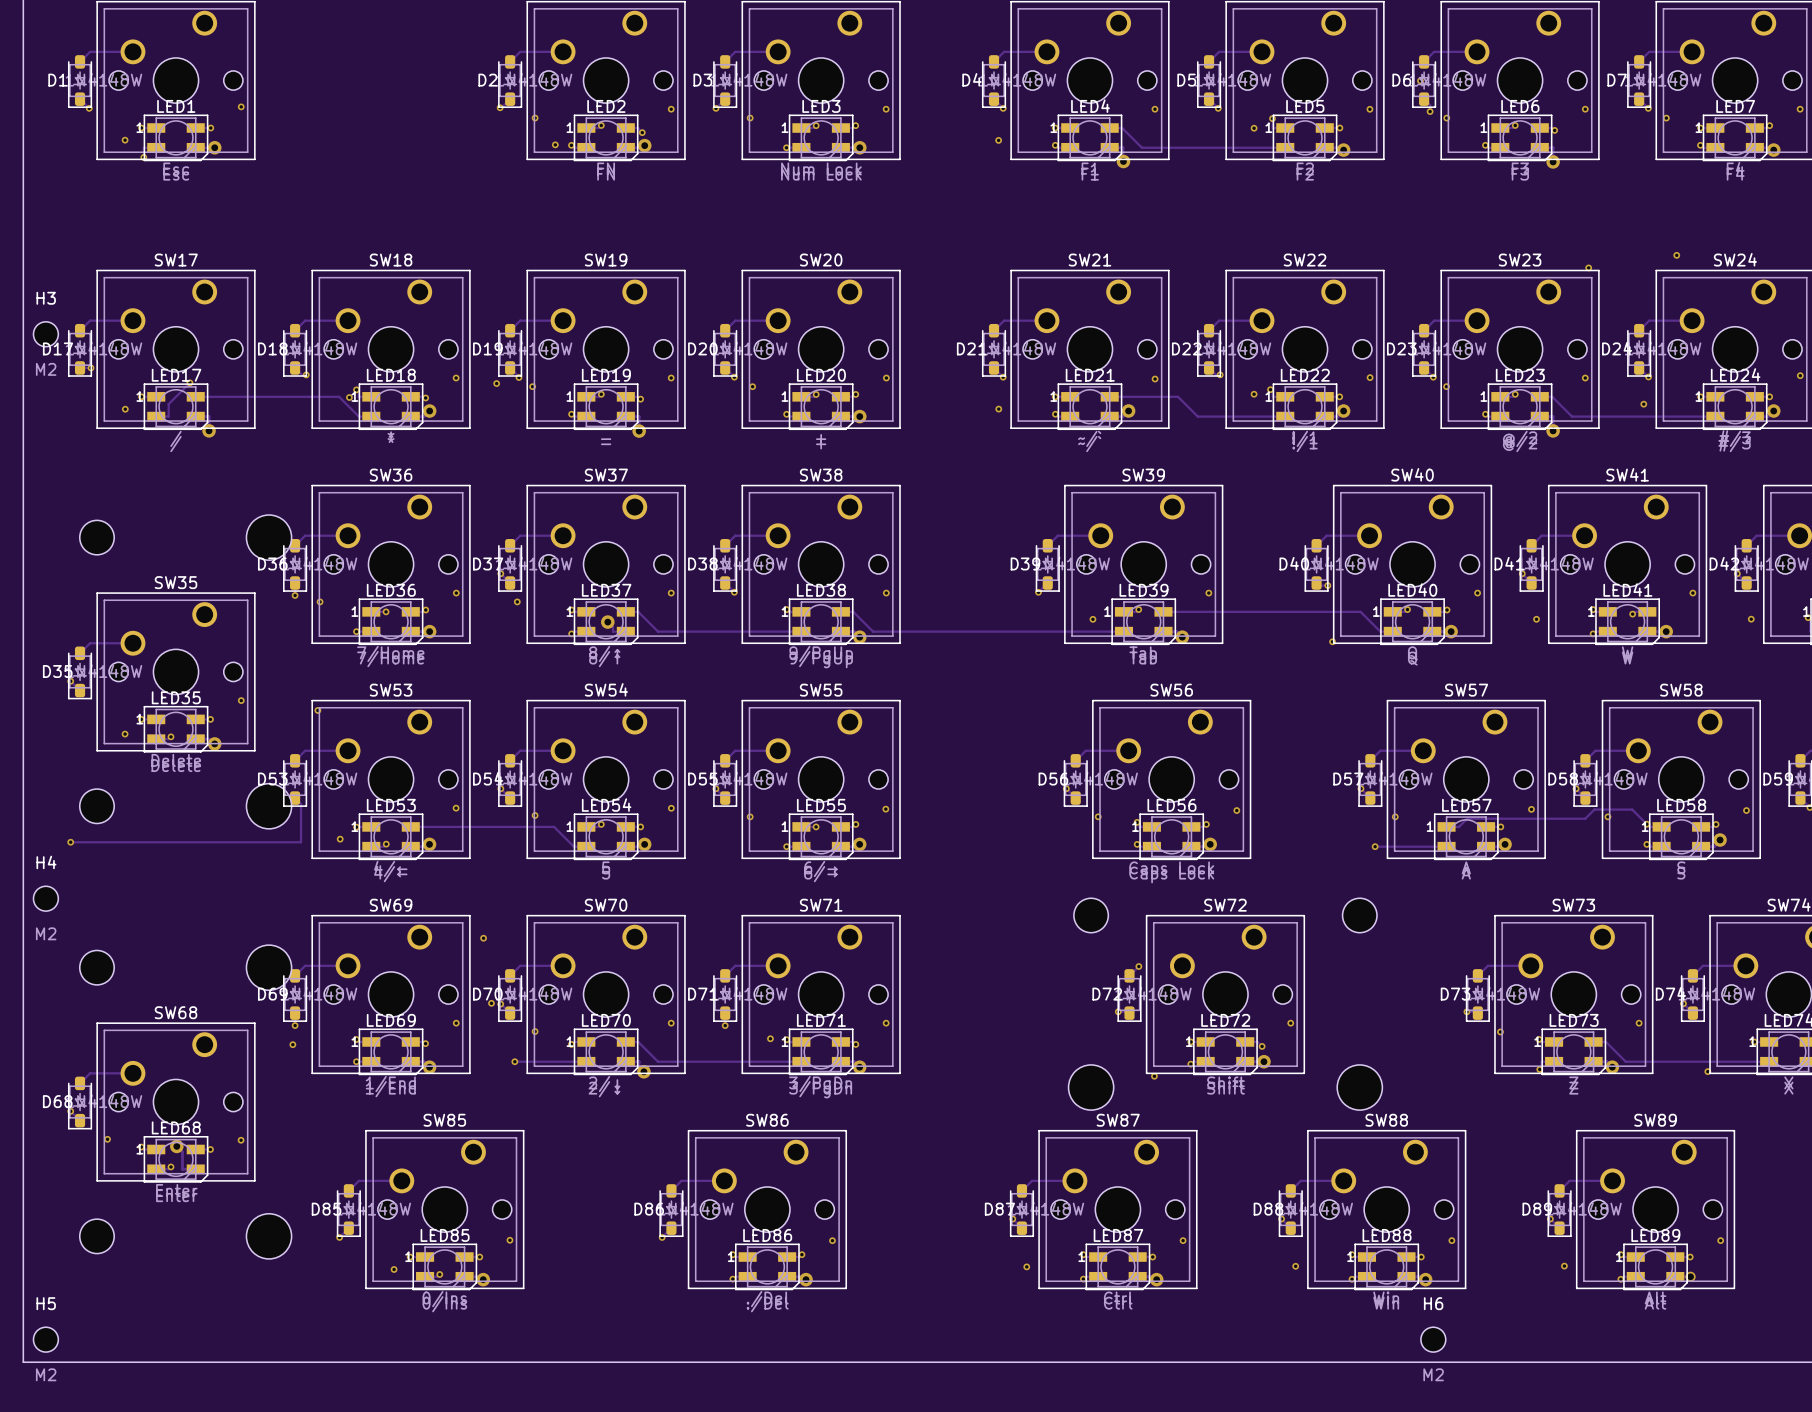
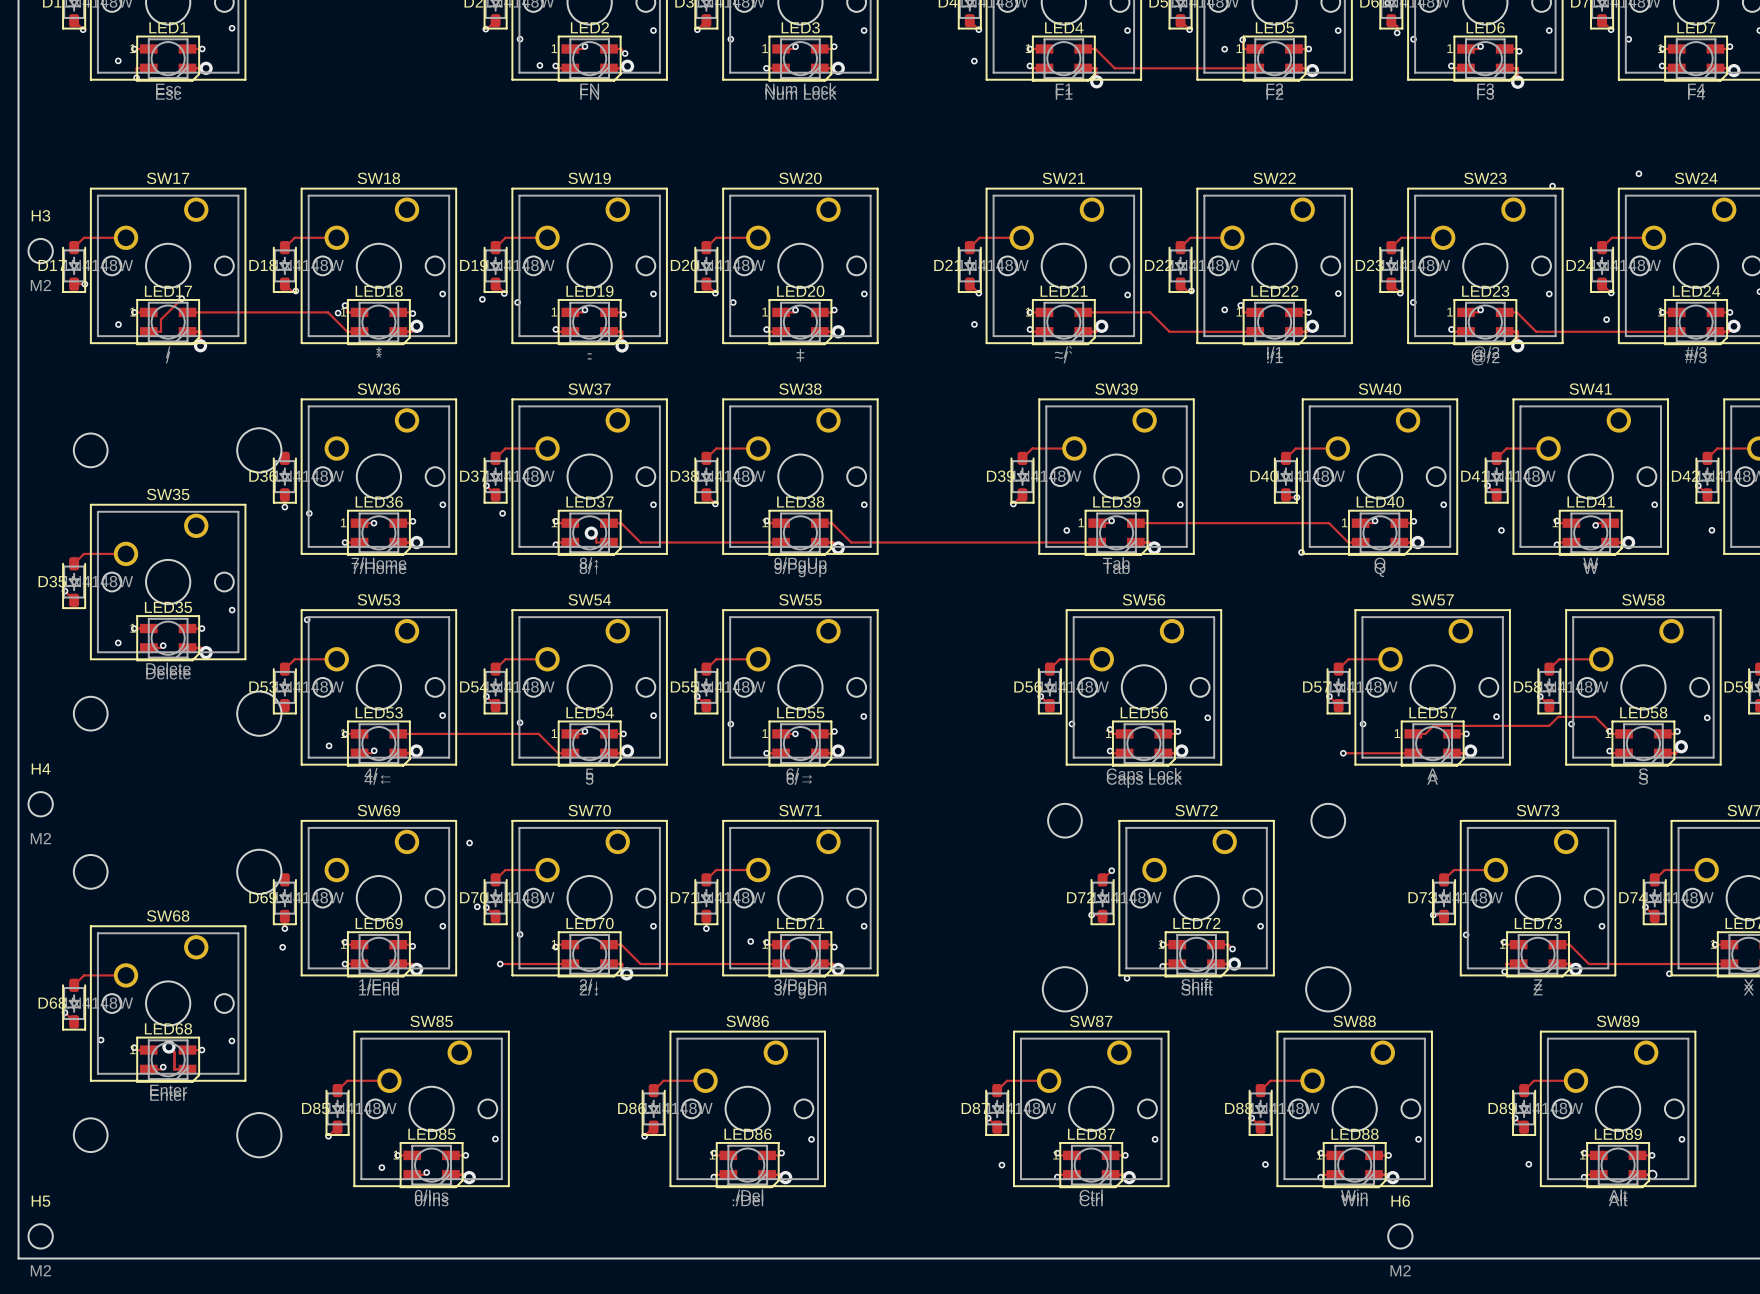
track: (348, 535) (305, 535) (295, 545) -> none
track: (295, 798) (301, 804) (301, 842) (70, 842) -> none
via: (70, 842) -> none
track: (348, 965) (305, 965) (295, 975) -> none

